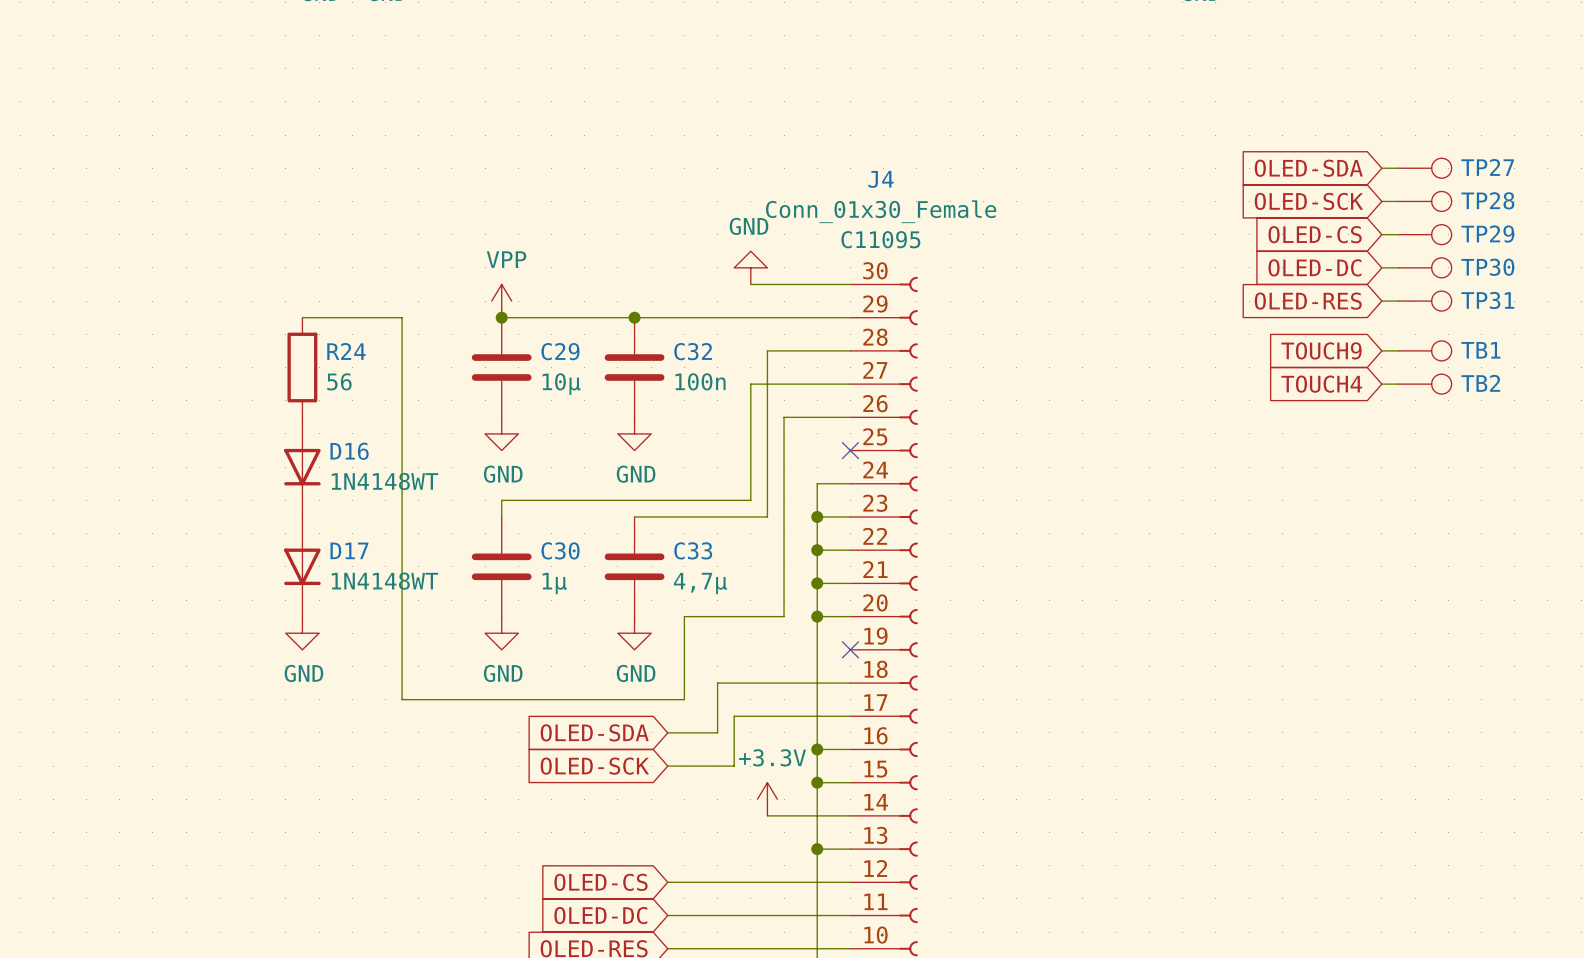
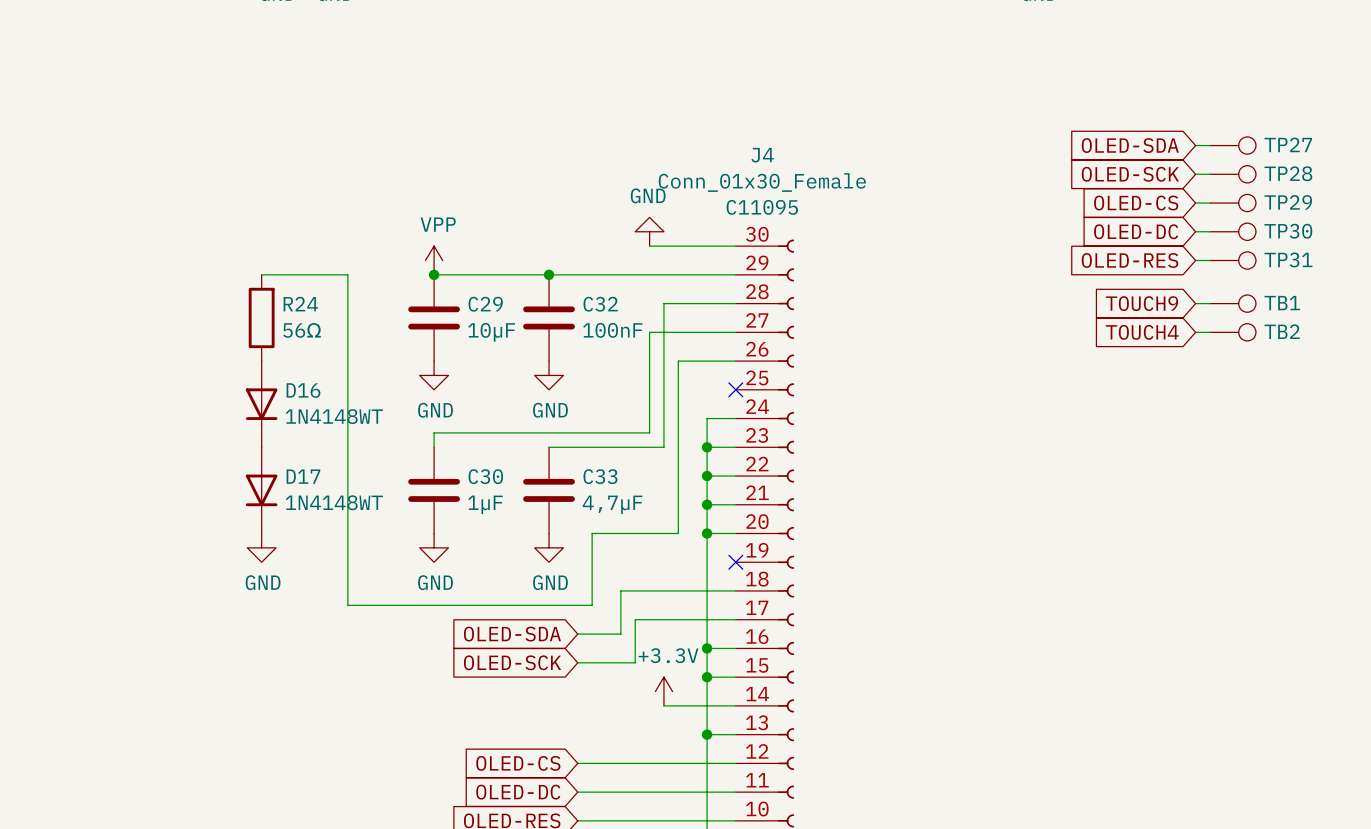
R24 value: 56 (339, 381) -> 56Ω (302, 330)
C32 value: 100n (700, 381) -> 100nF (612, 330)
C29 value: 10µ (561, 384) -> 10µF (491, 332)
C30 value: 1µ (554, 583) -> 1µF (485, 504)
C33 value: 4,7µ (700, 583) -> 4,7µF (612, 504)

